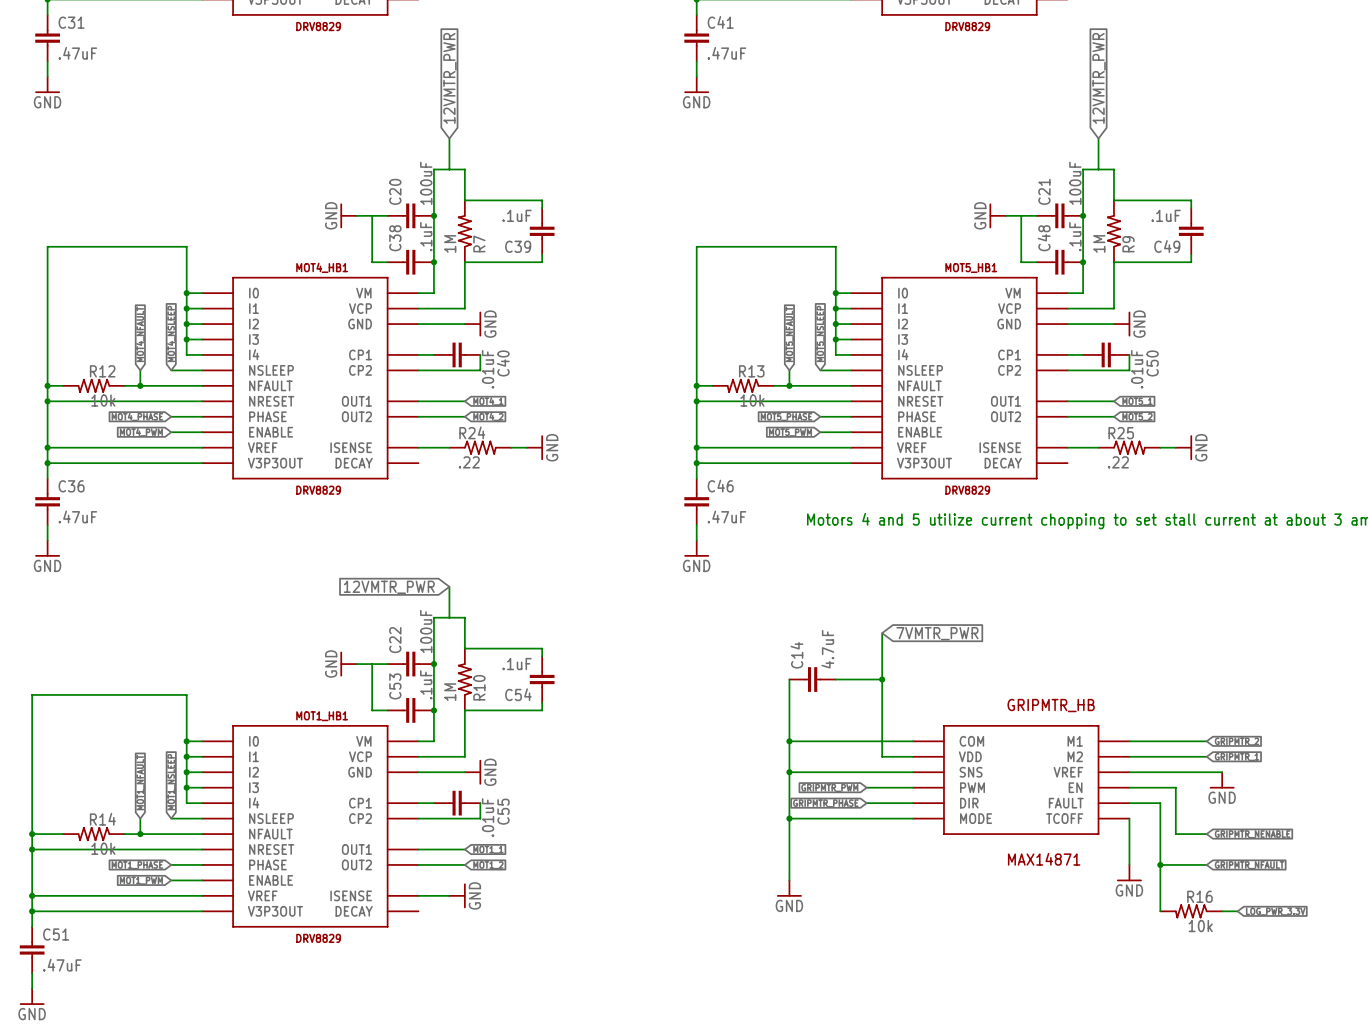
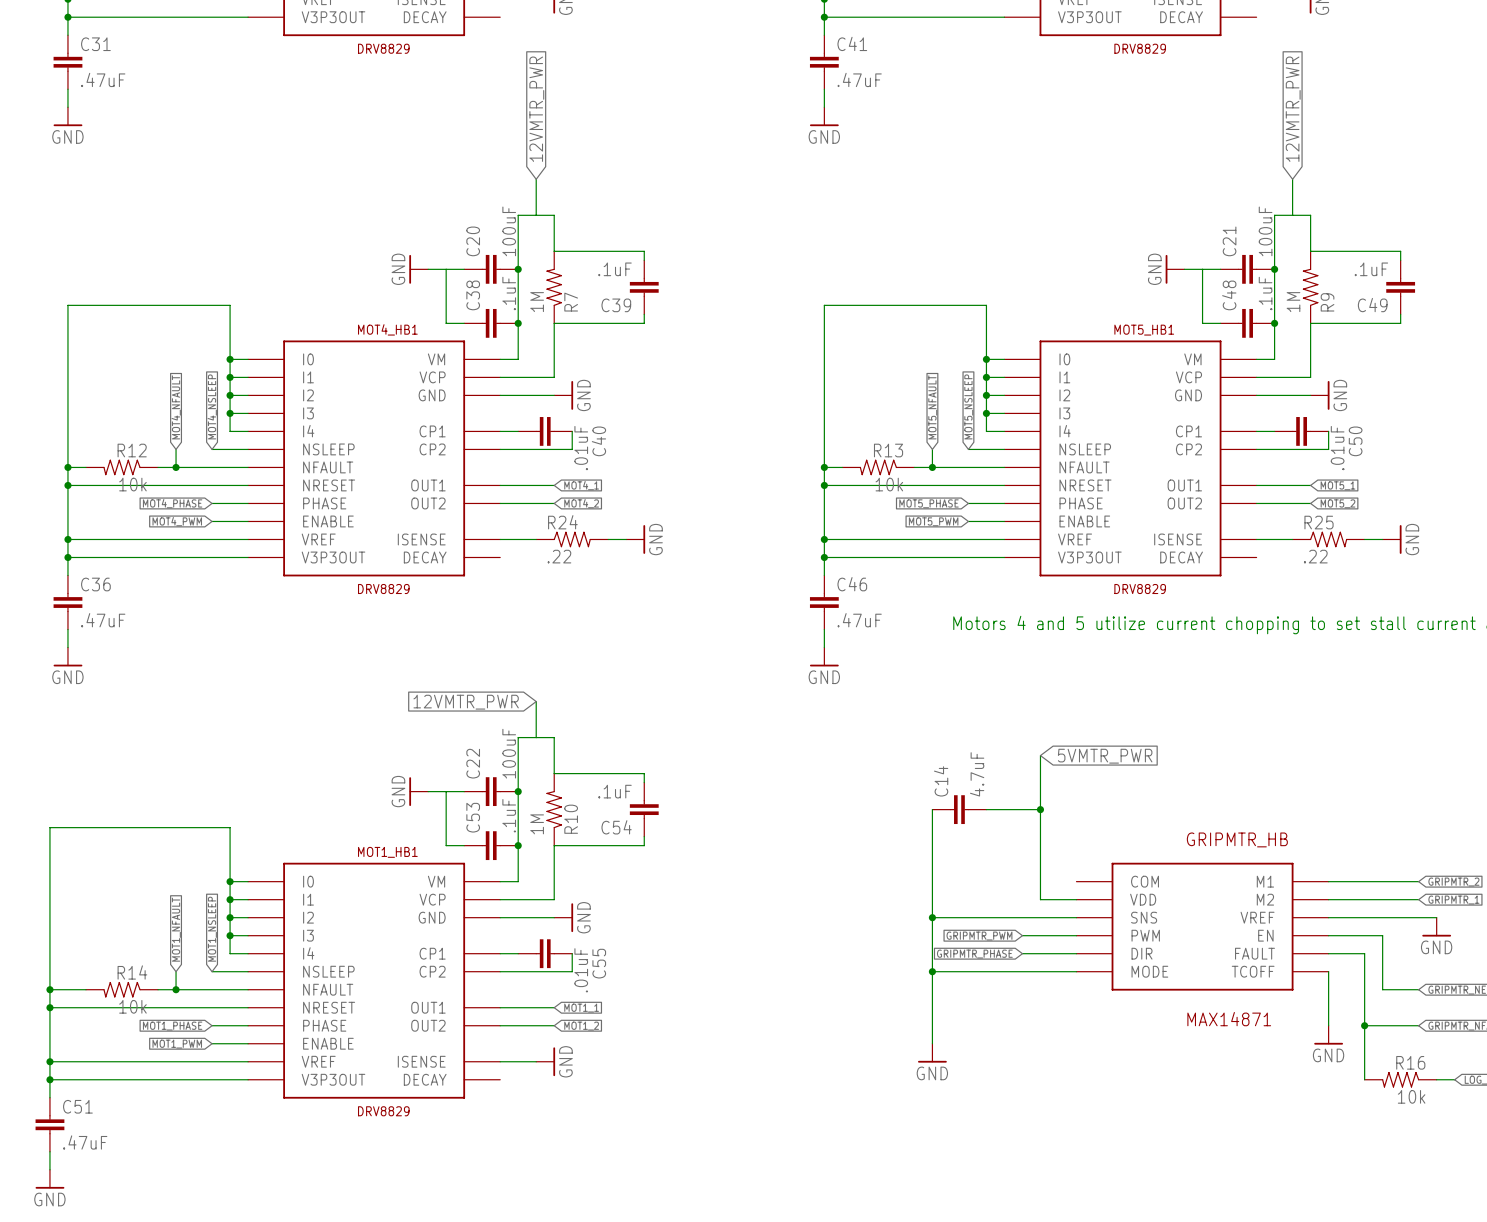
global label: 7VMTR_PWR (937, 633) -> 5VMTR_PWR (1105, 756)
wire: (789, 741) (913, 741) -> none
junction: (789, 741) -> none

